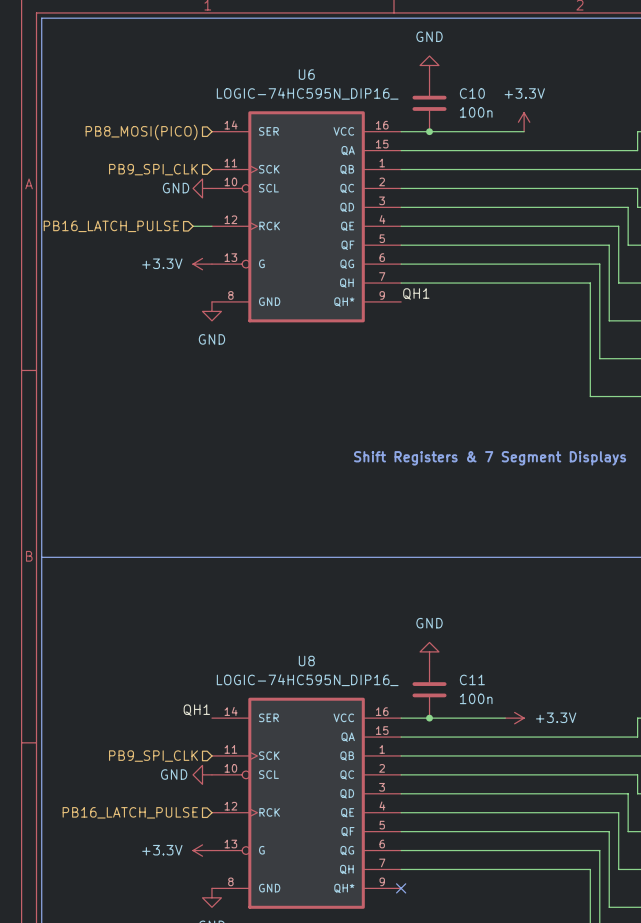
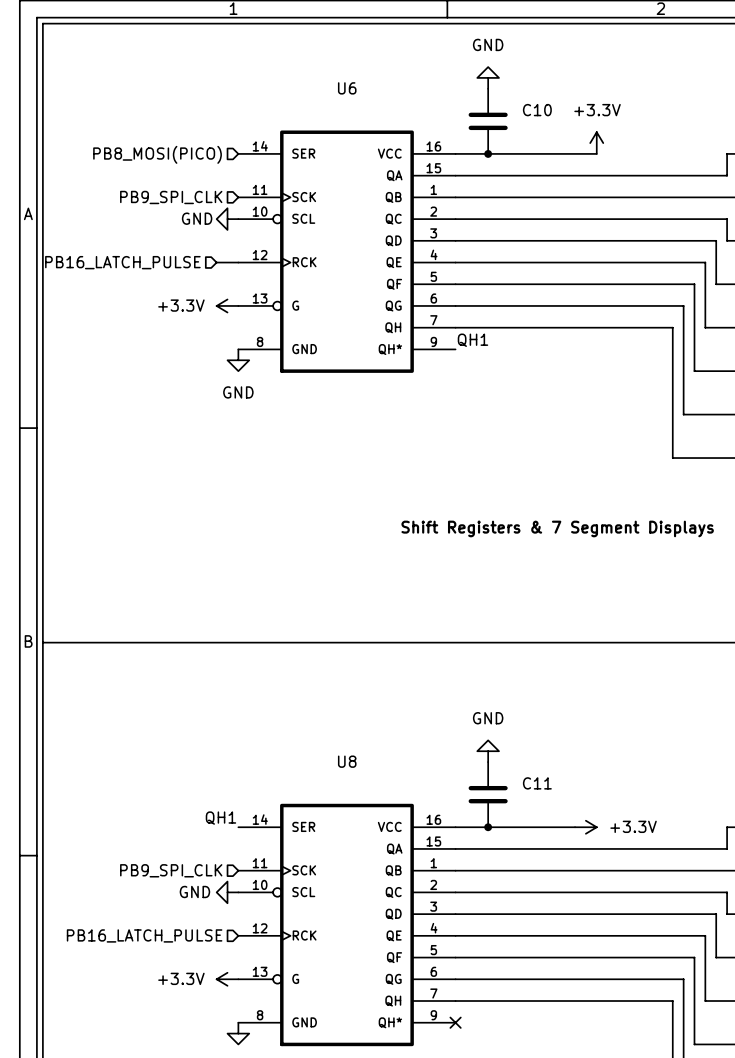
U6 value: LOGIC-74HC595N_DIP16_ (307, 93) -> none
C10 value: 100n (476, 112) -> none
U8 value: LOGIC-74HC595N_DIP16_ (307, 680) -> none
C11 value: 100n (476, 698) -> none

